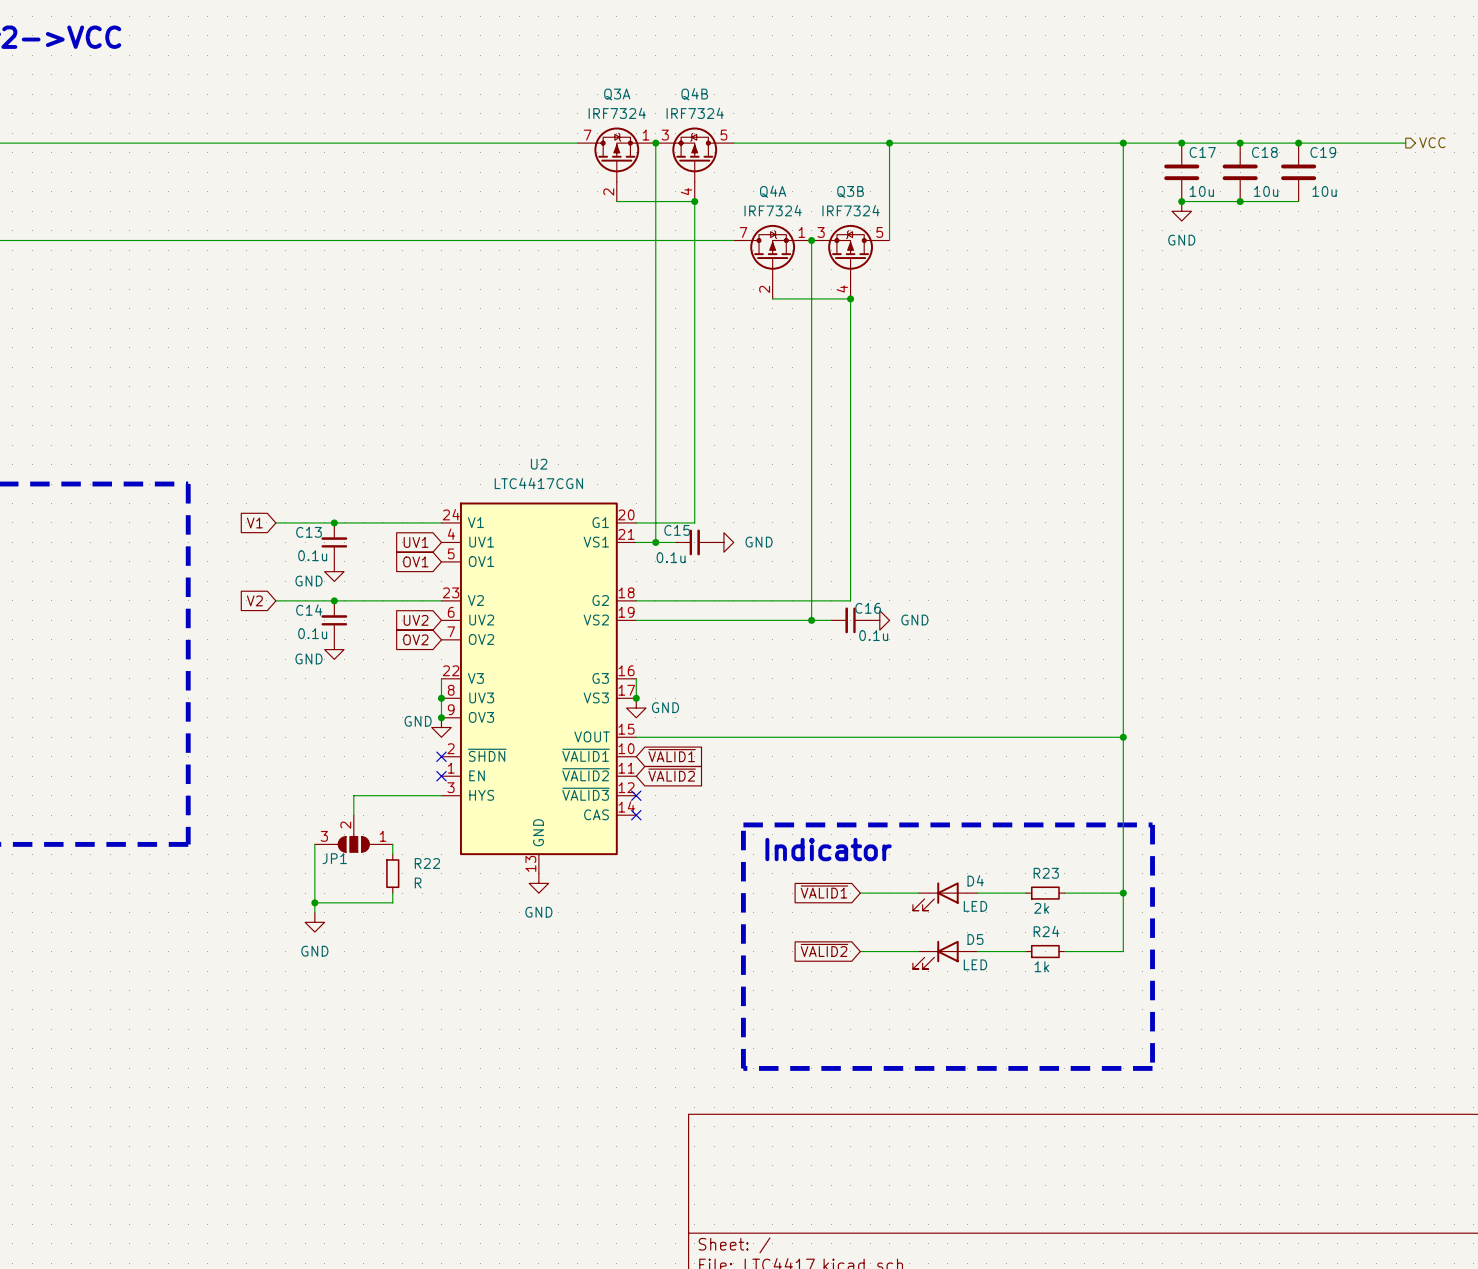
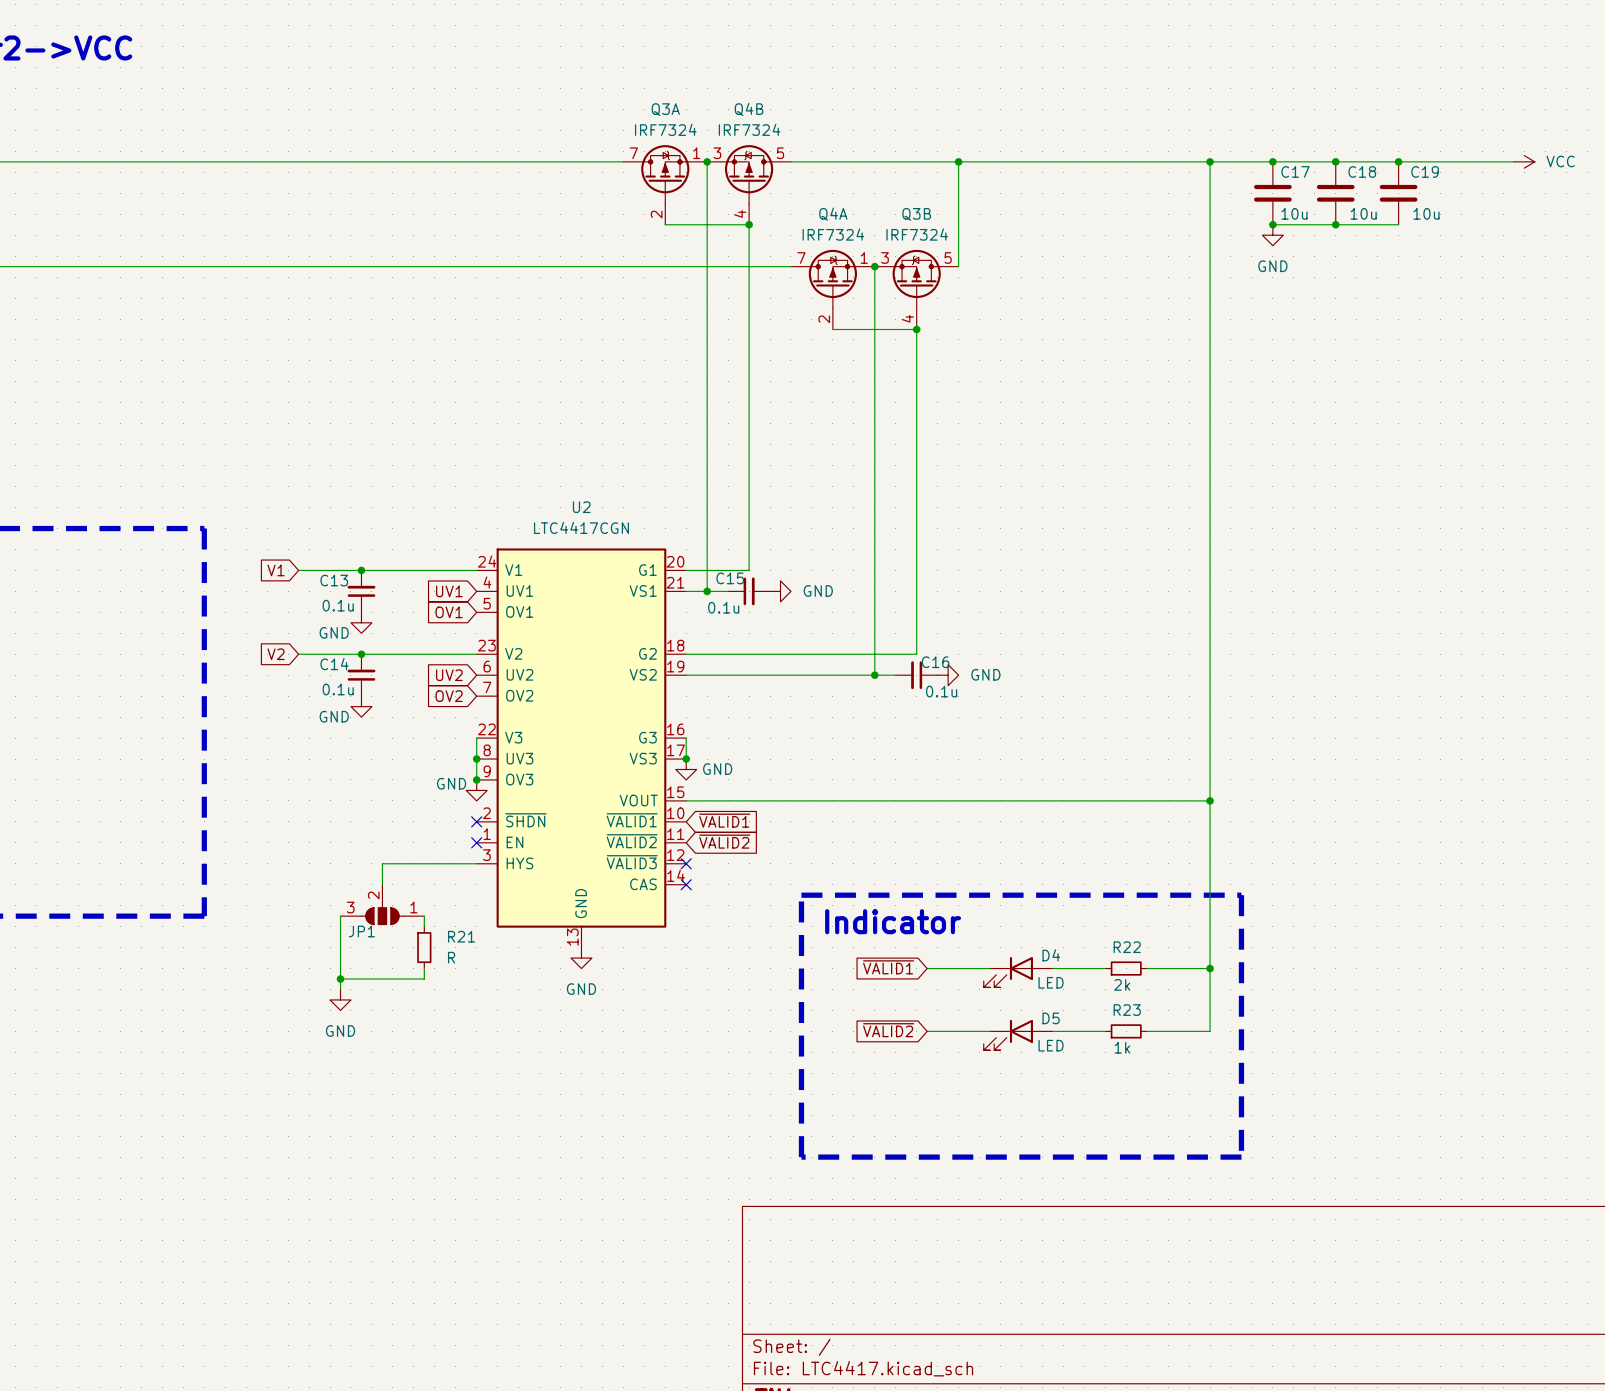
hierarchical label: VCC (1432, 142) -> none
power symbol: none -> VCC (1524, 161)
R22 name: R22 (427, 863) -> R21 (461, 936)
R23 name: R23 (1046, 873) -> R22 (1127, 947)
R24 name: R24 (1046, 931) -> R23 (1127, 1010)

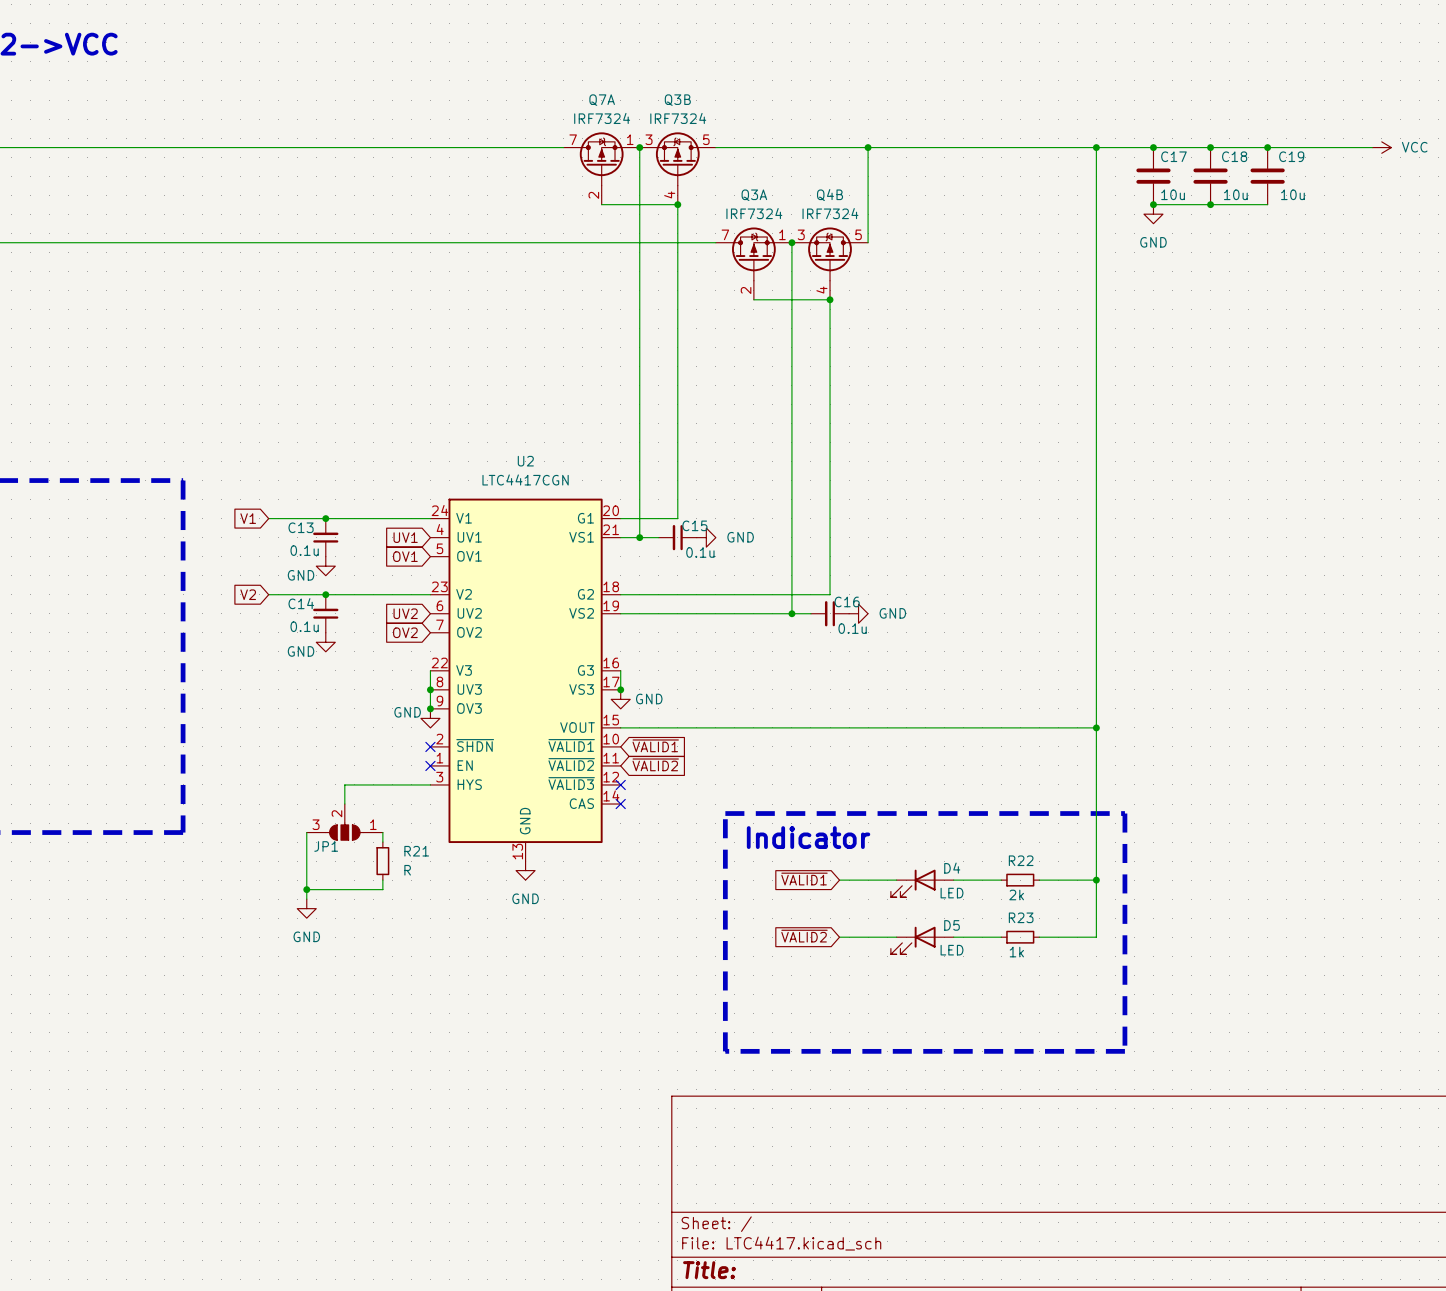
Q3A name: Q3A (665, 109) -> Q7A (602, 100)
Q4B name: Q4B (749, 109) -> Q3B (677, 100)
Q4A name: Q4A (833, 214) -> Q3A (754, 195)
Q3B name: Q3B (916, 214) -> Q4B (830, 195)
C15 name position: C15 (730, 578) -> C15 (694, 525)
C15 rotation: 0° (749, 591) -> 180° (677, 537)
C15 value position: 0.1u (723, 607) -> 0.1u (700, 552)

